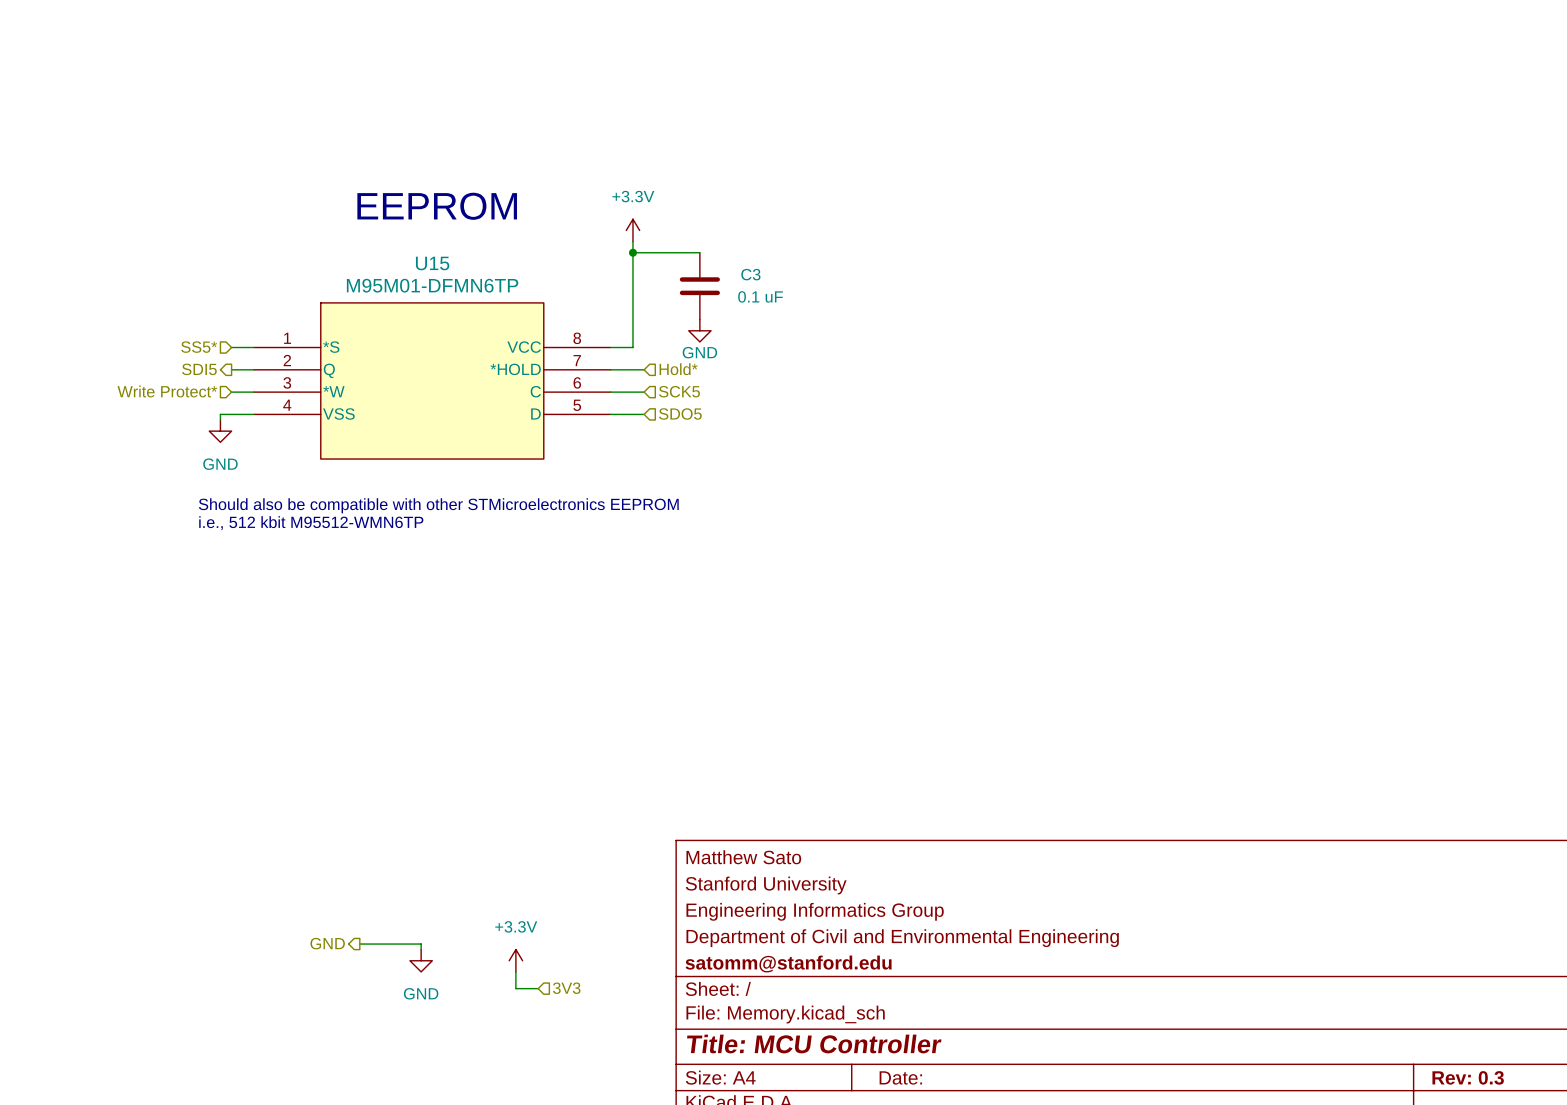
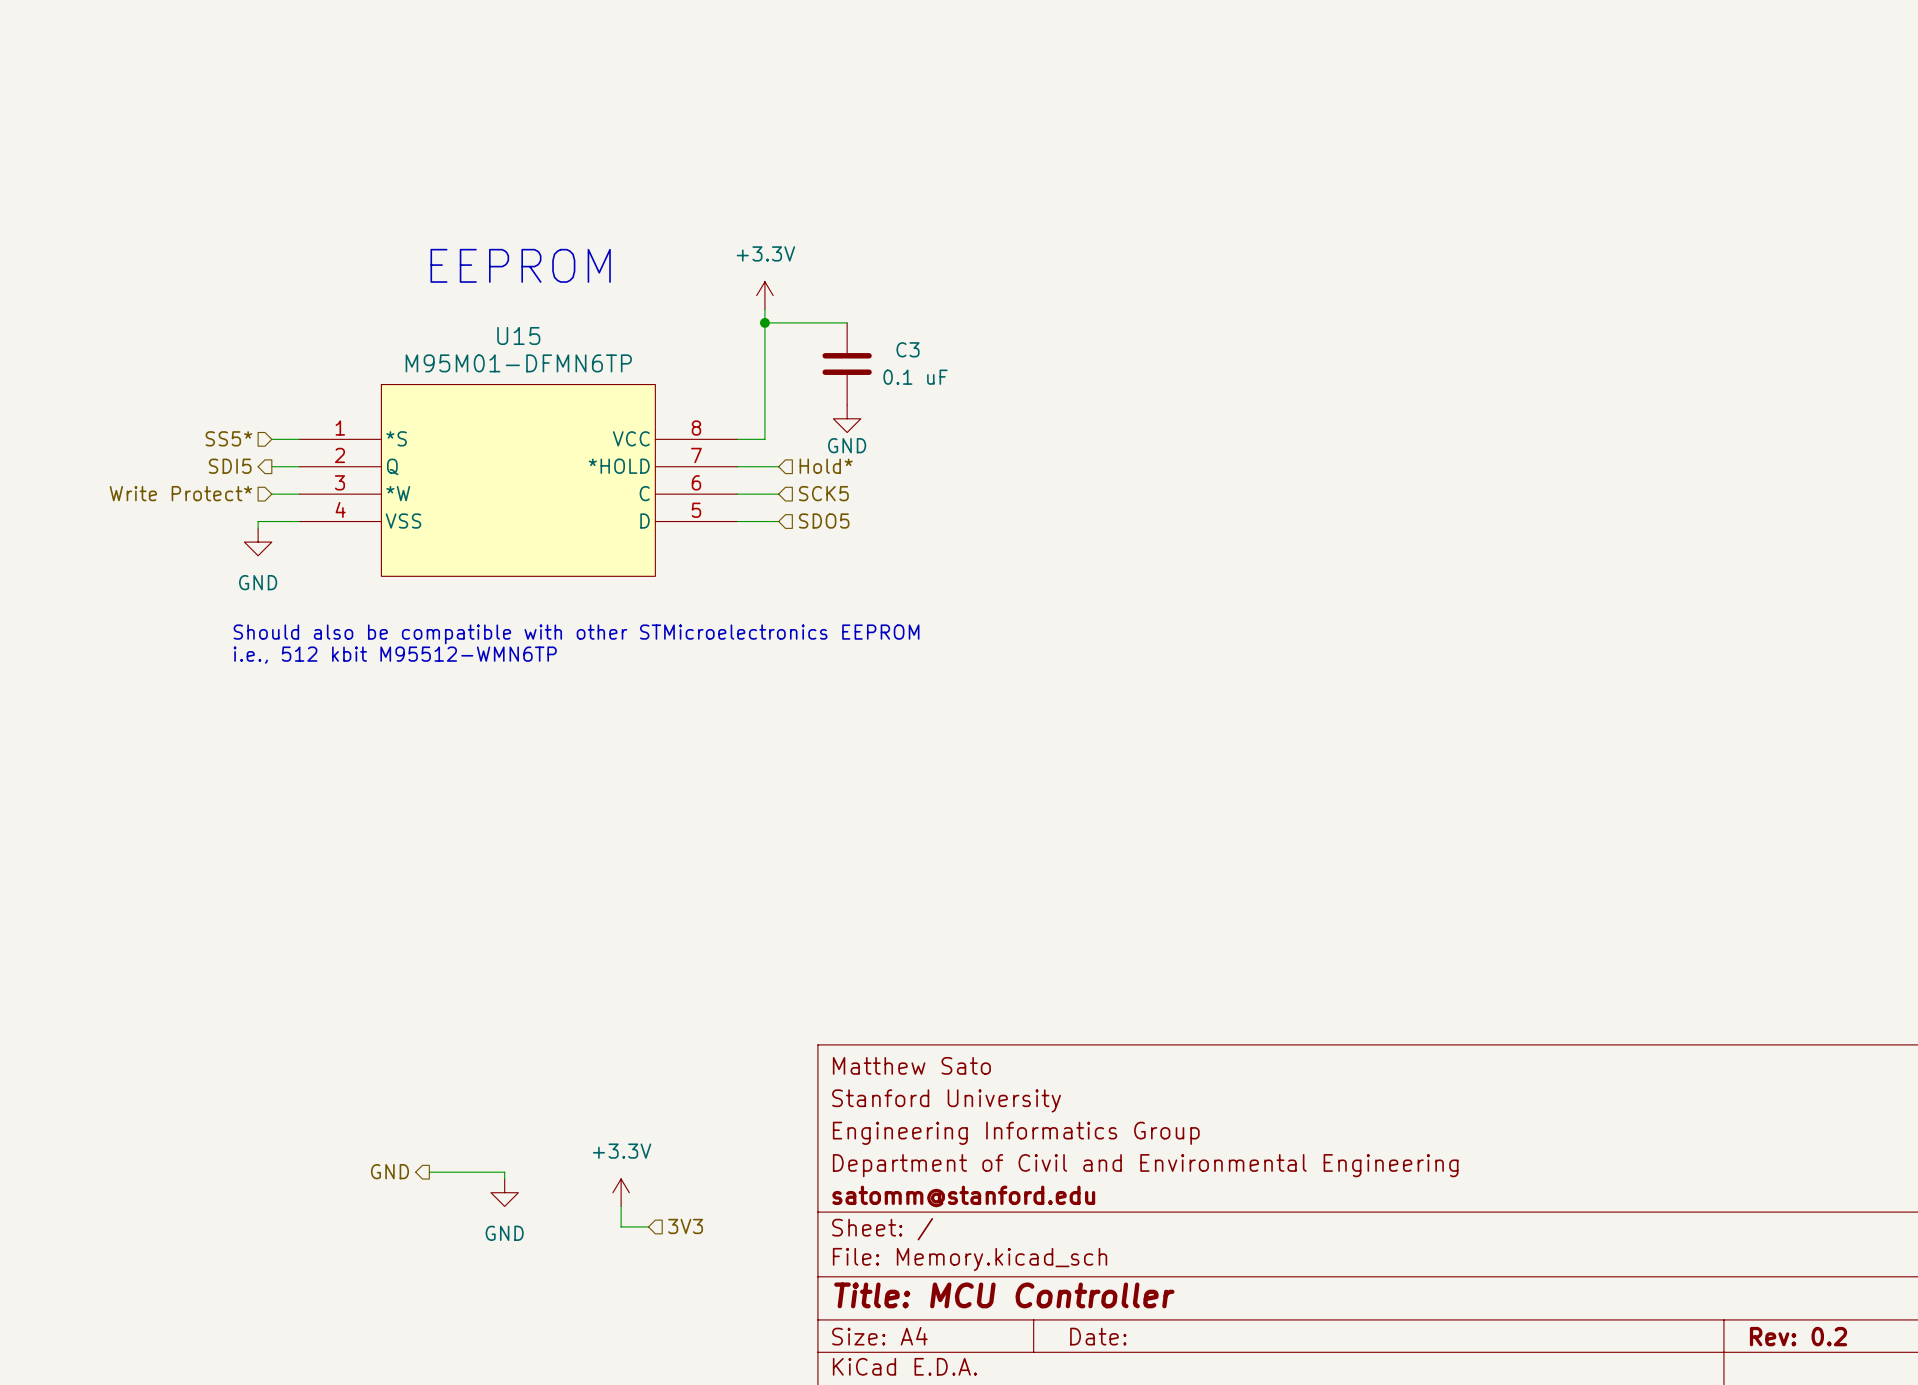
title block: Rev: 0.3 (1468, 1077) -> Rev: 0.2 (1798, 1336)

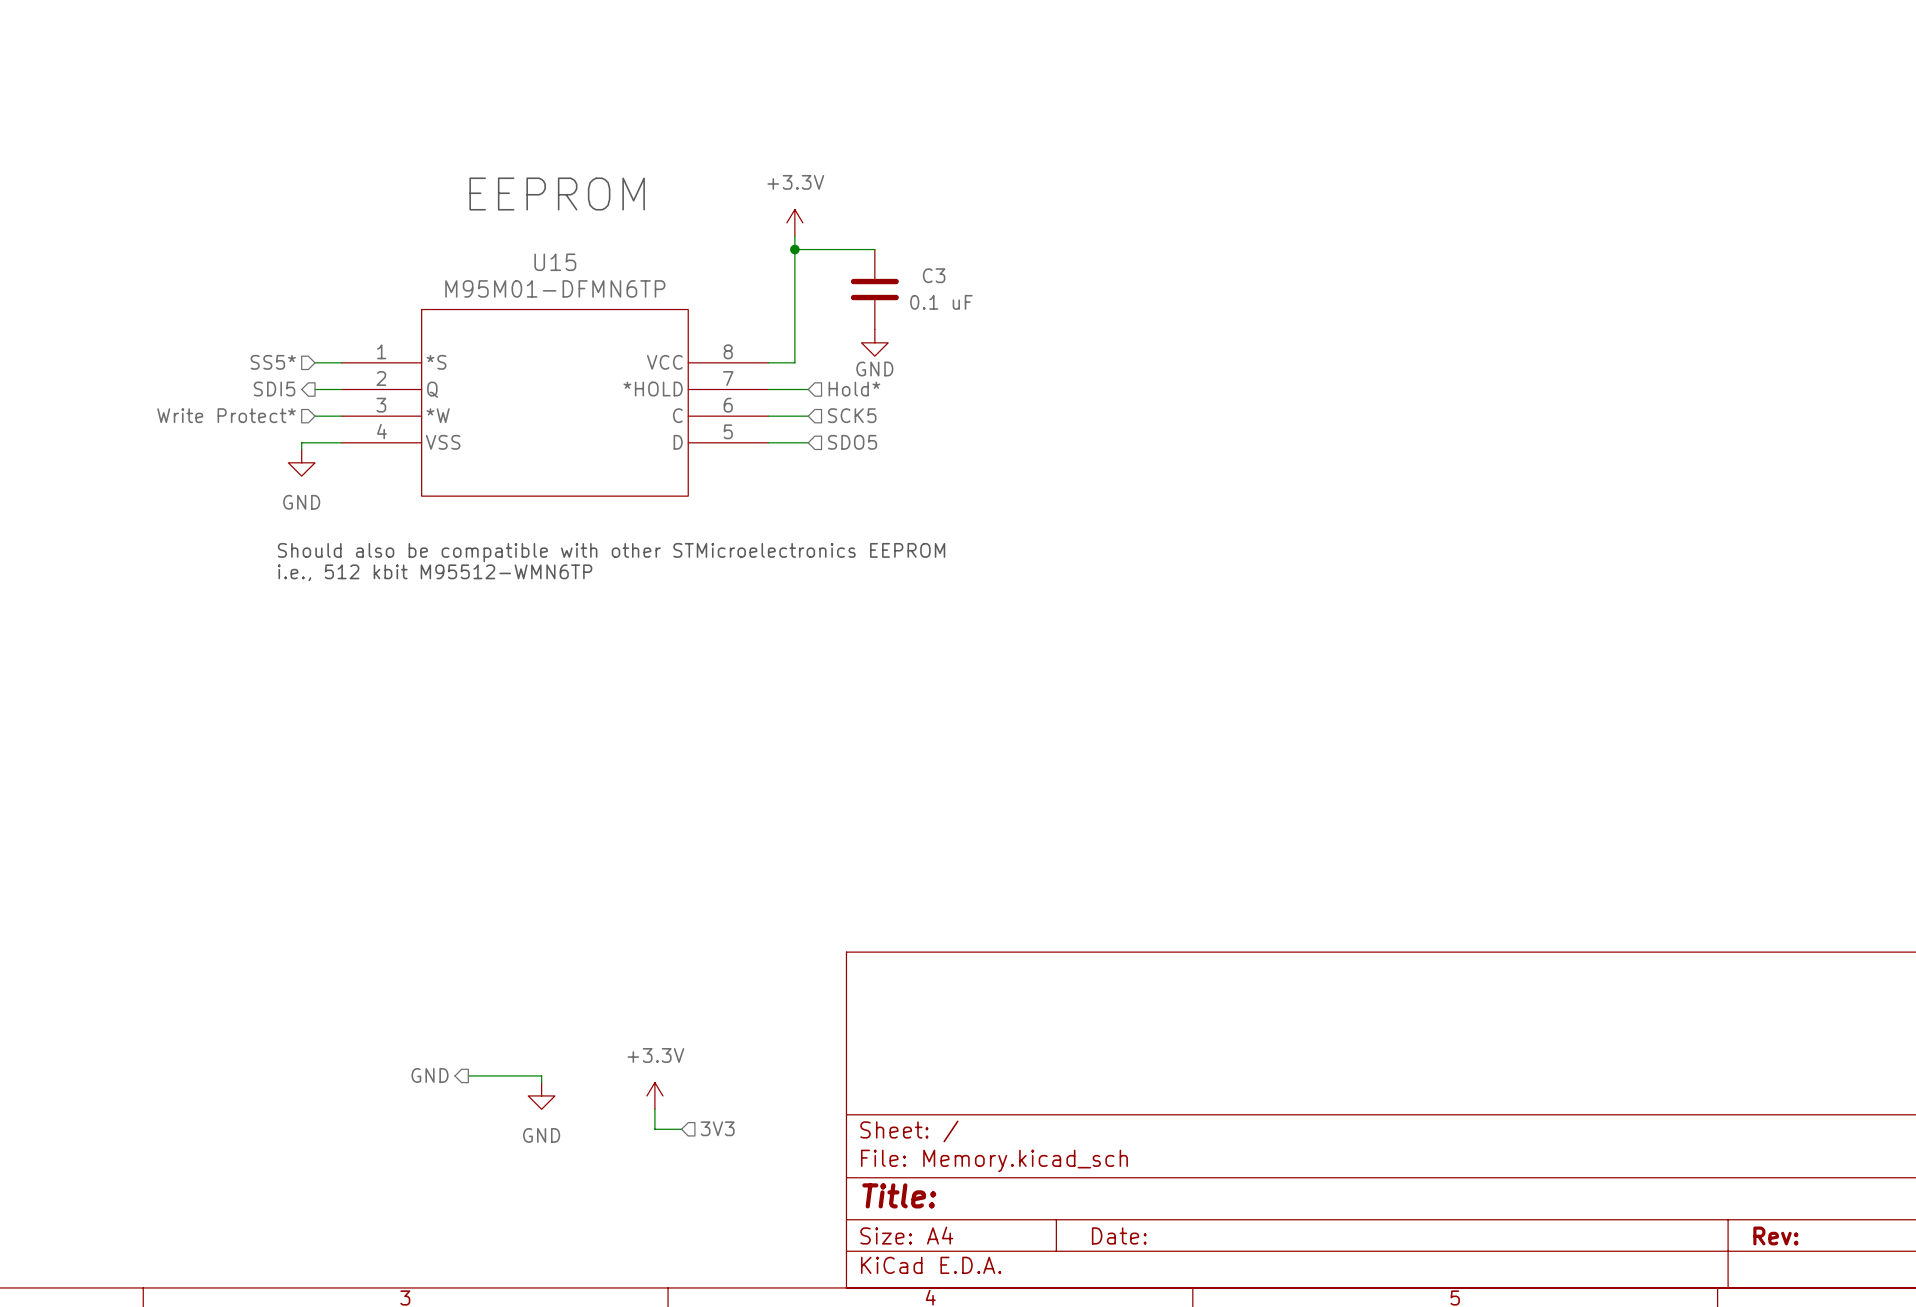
title block: Matthew Sato (911, 1065) -> none
title block: Stanford University (946, 1100) -> none
title block: Engineering Informatics Group (1016, 1133) -> none
title block: Department of Civil and Environmental Engineering (1145, 1165) -> none
title block: satomm@stanford.edu (963, 1196) -> none
title block: Title: MCU Controller (1004, 1295) -> Title: (899, 1195)
title block: Rev: 0.2 (1798, 1336) -> Rev: (1775, 1235)

